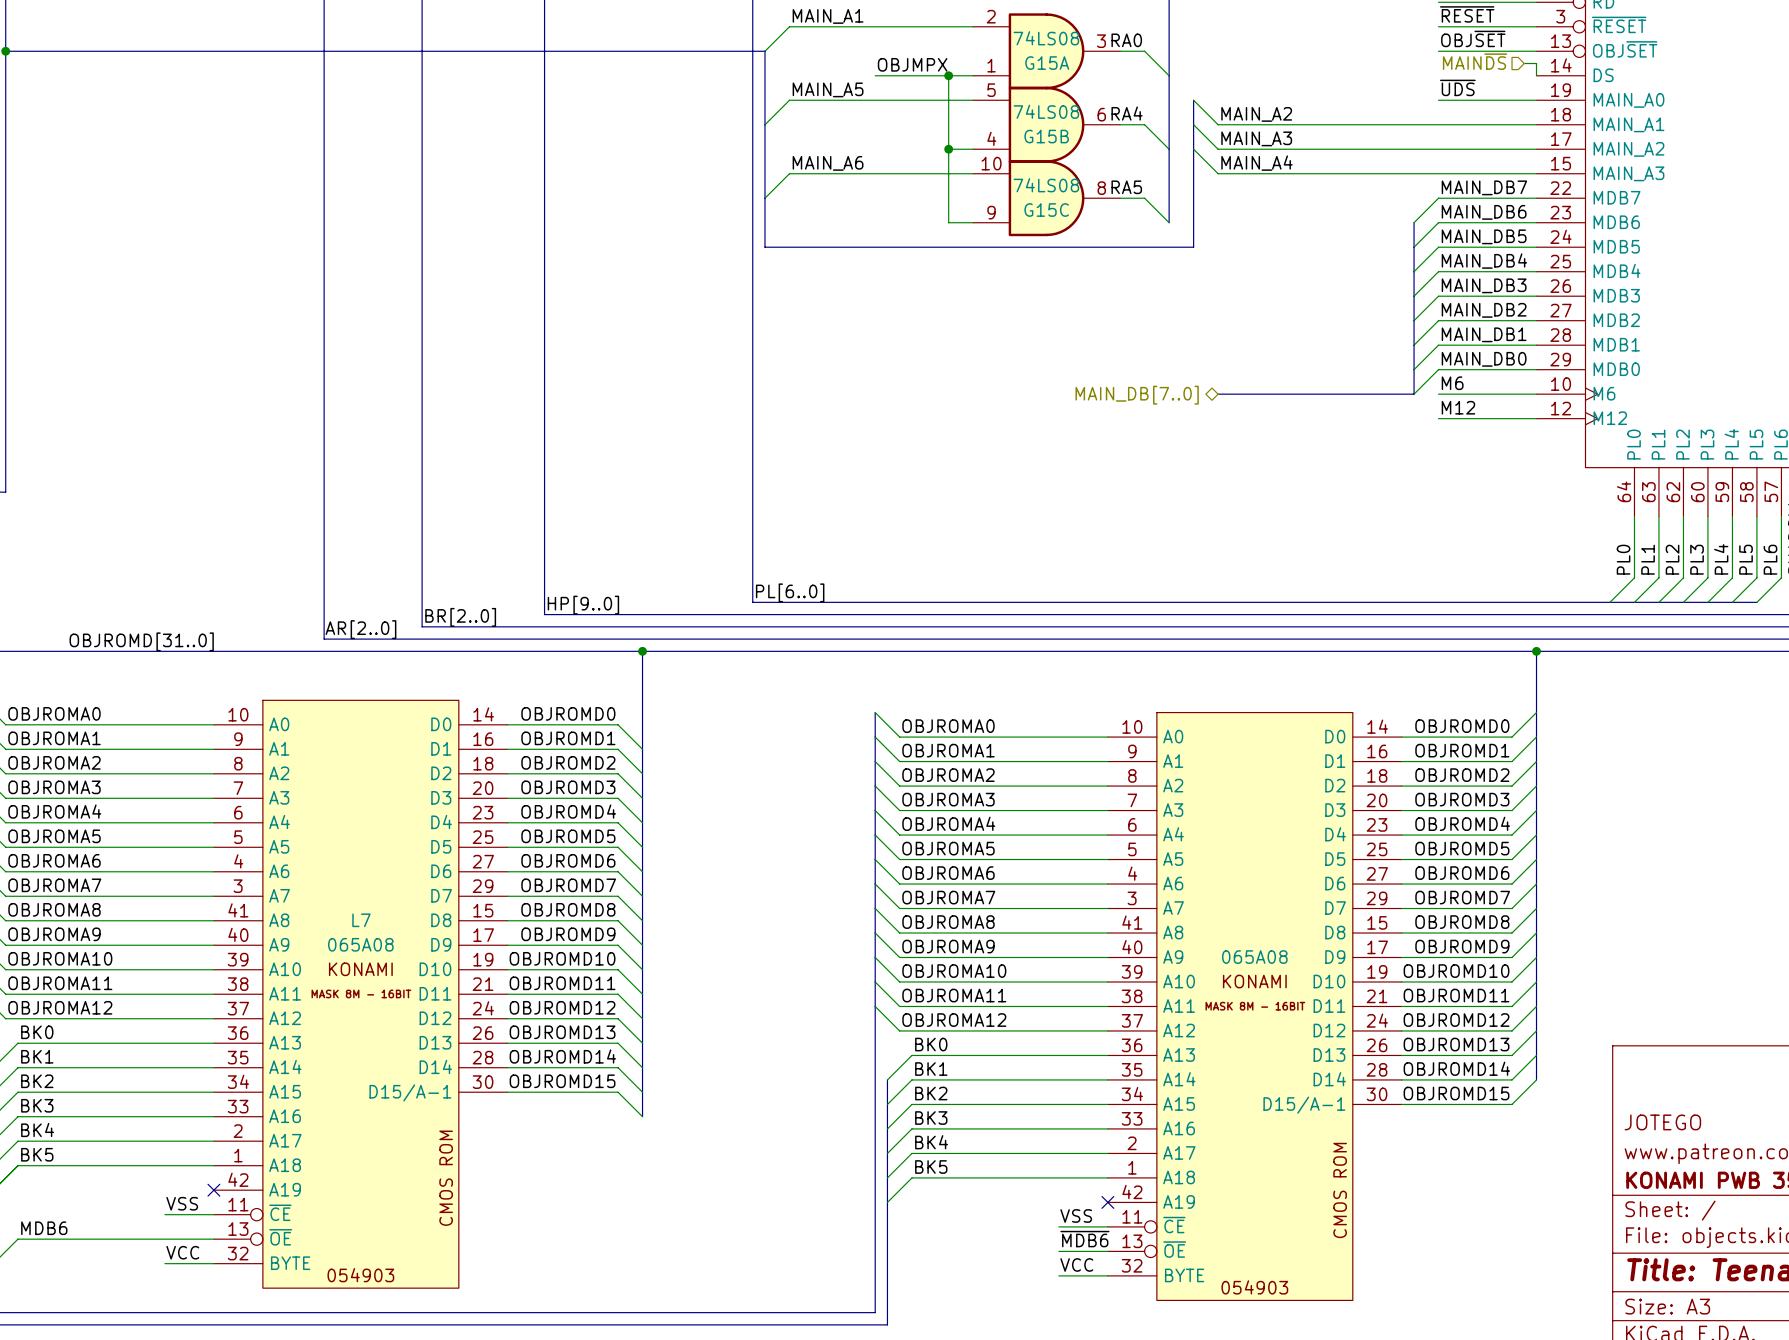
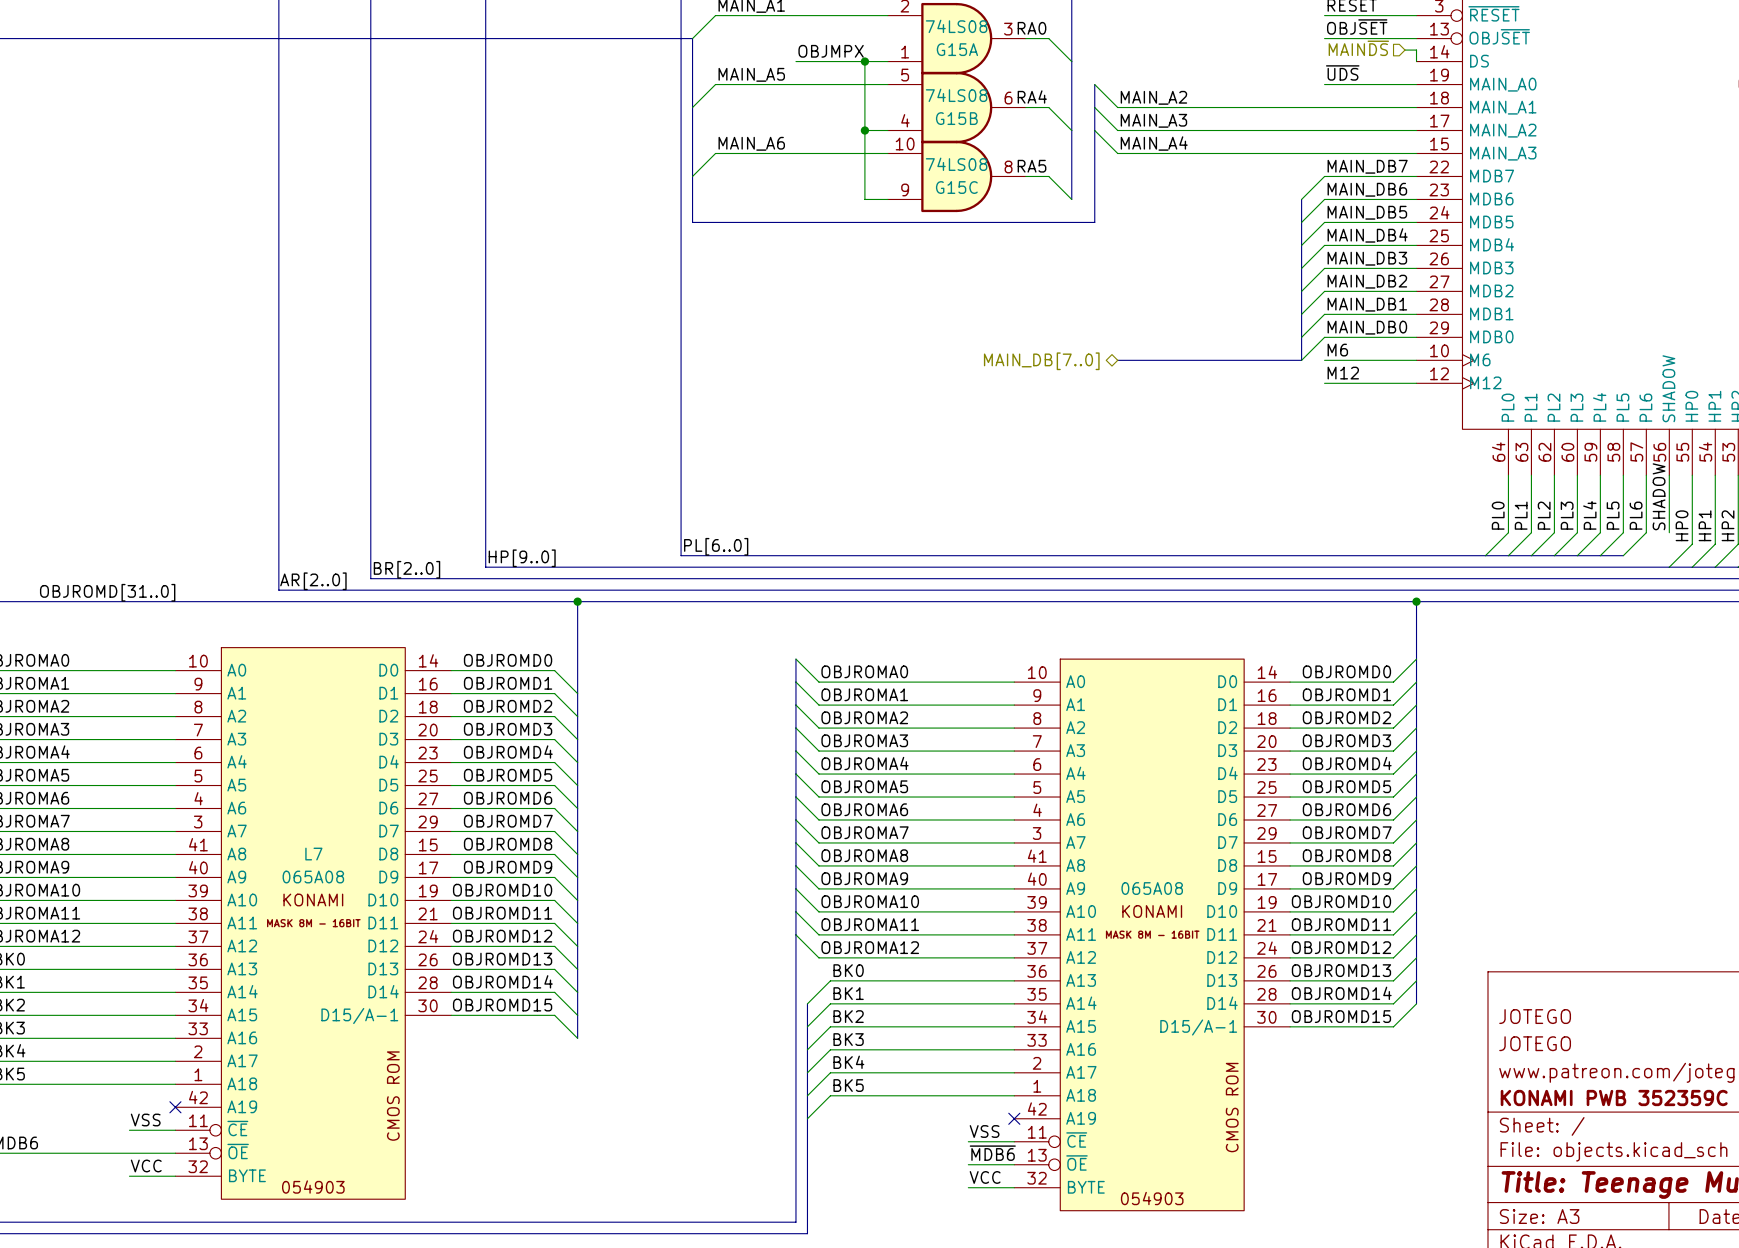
title block: none -> JOTEGO (1535, 1016)

